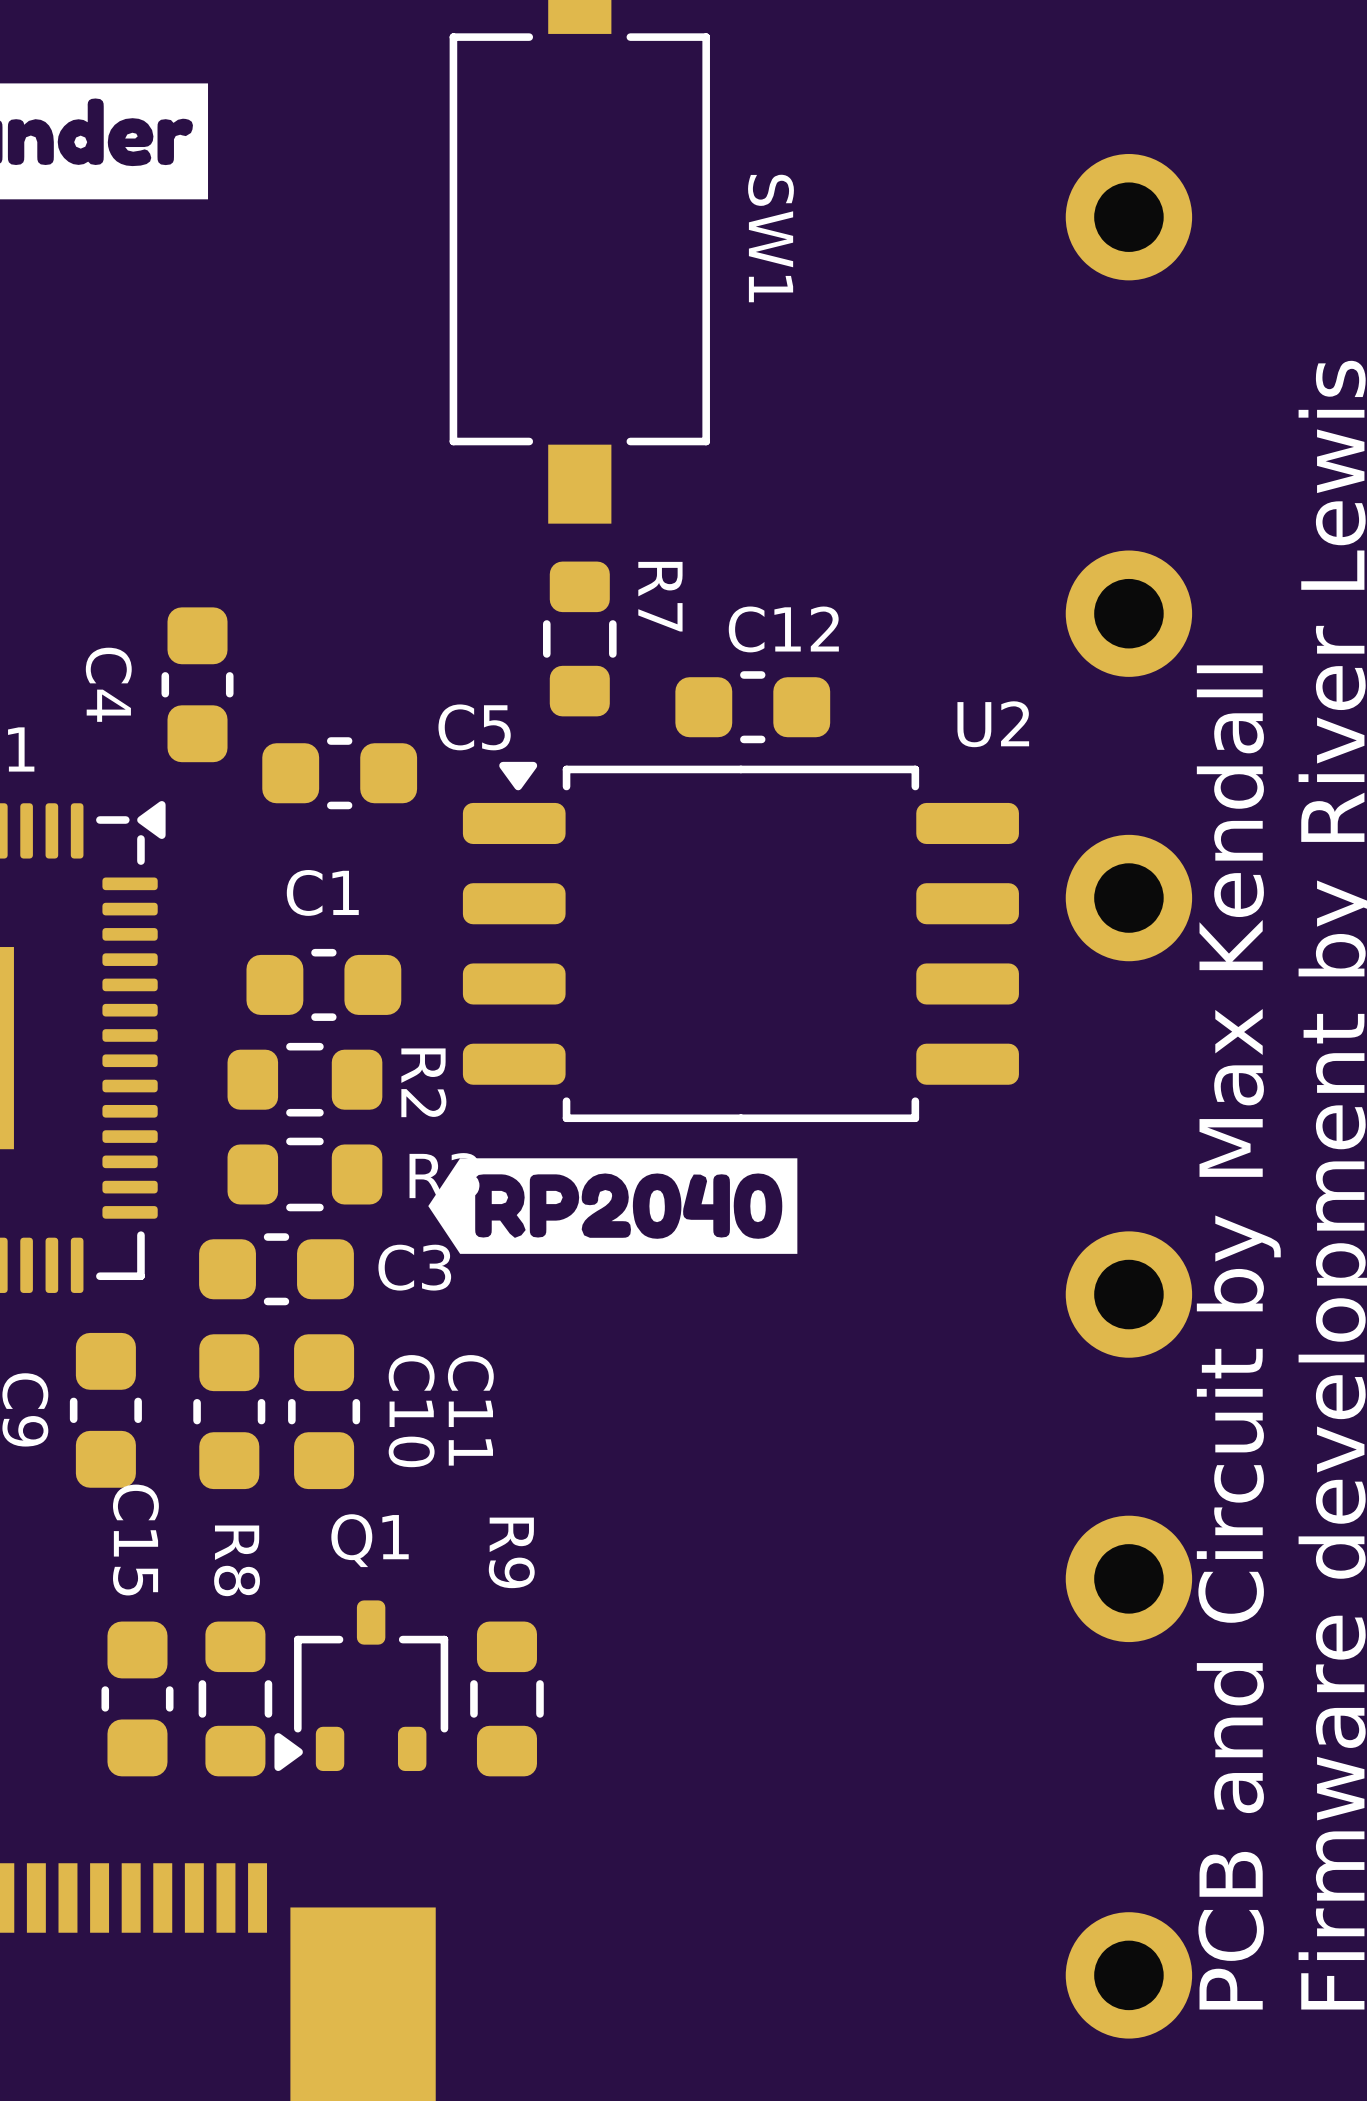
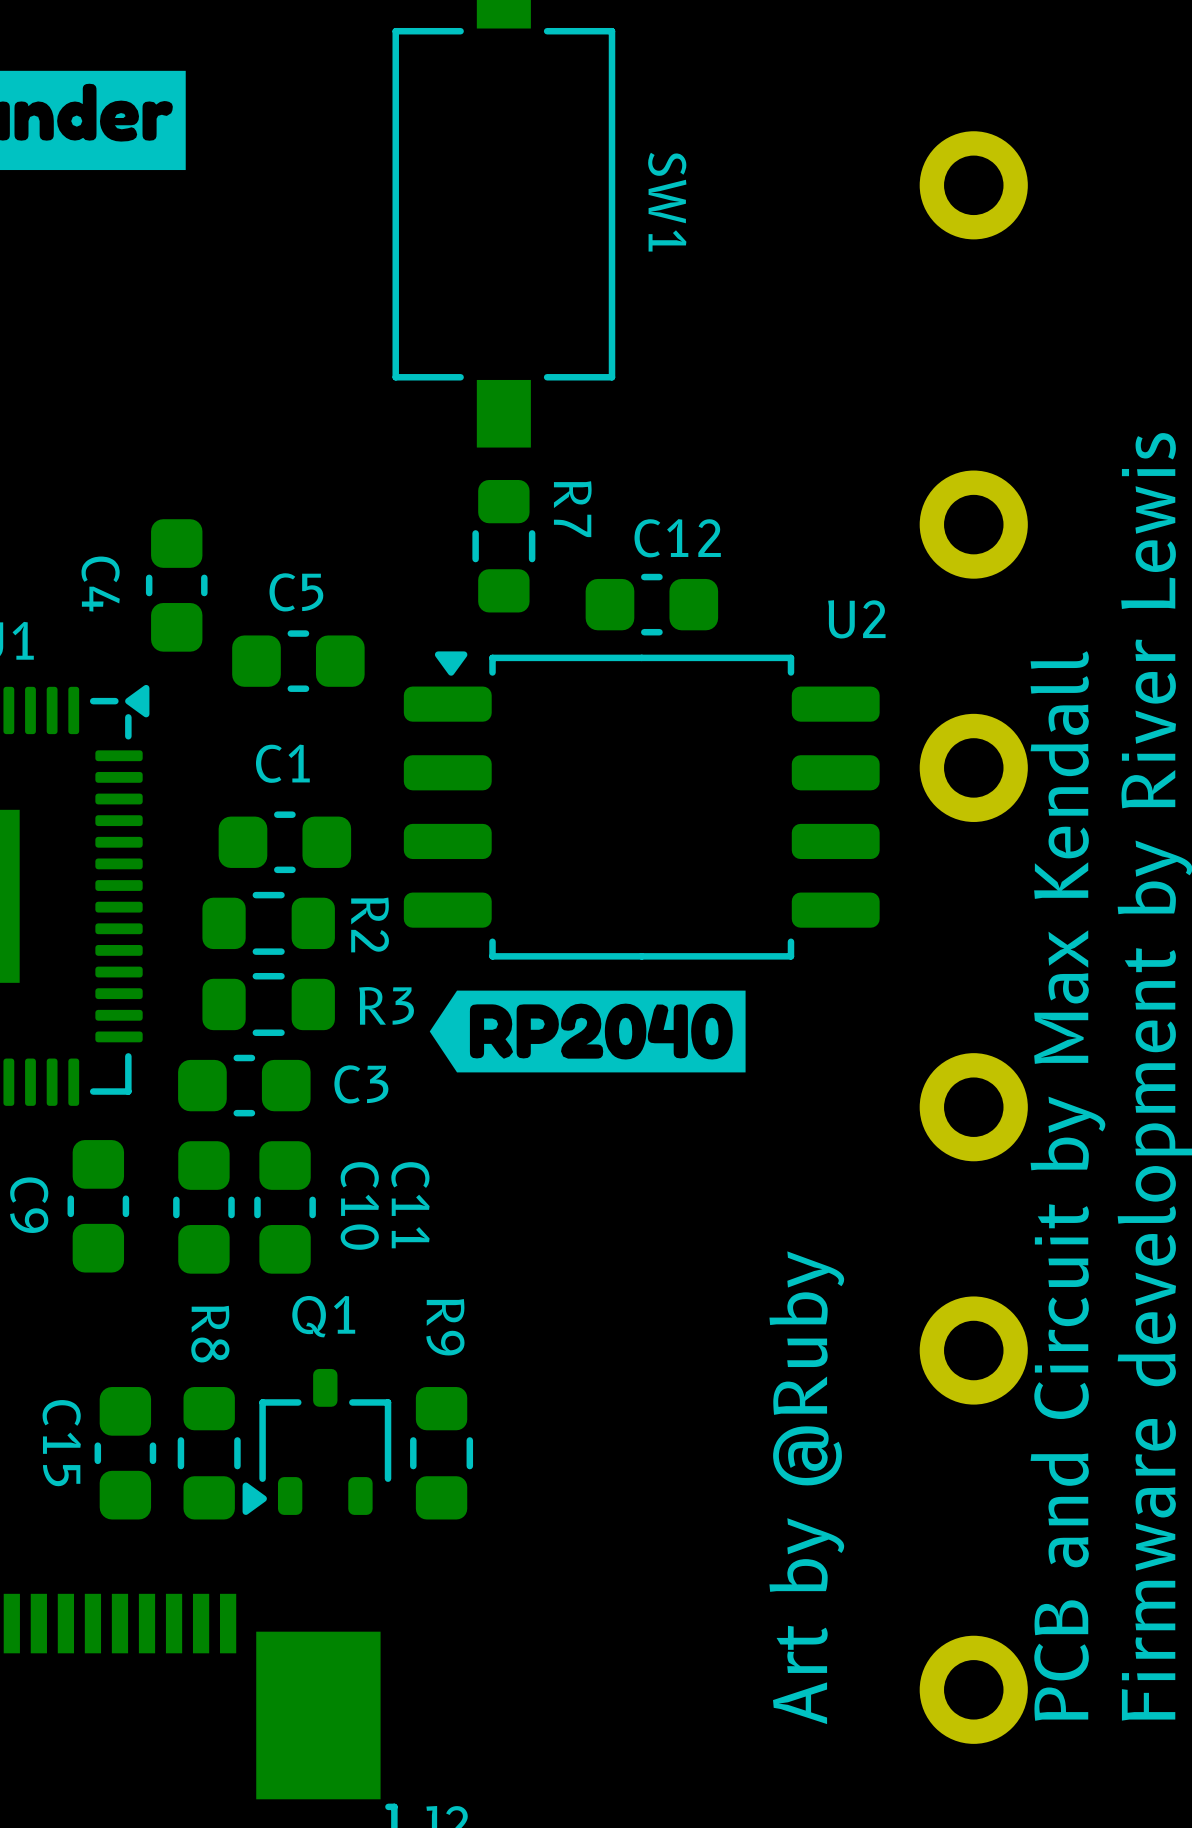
C5 name position: C5 (474, 727) -> C5 (296, 592)
drawing position: (612, 1206) -> (587, 1031)
C15 name position: C15 (135, 1540) -> C15 (61, 1443)
text: none -> Art by @Ruby (806, 1487)

